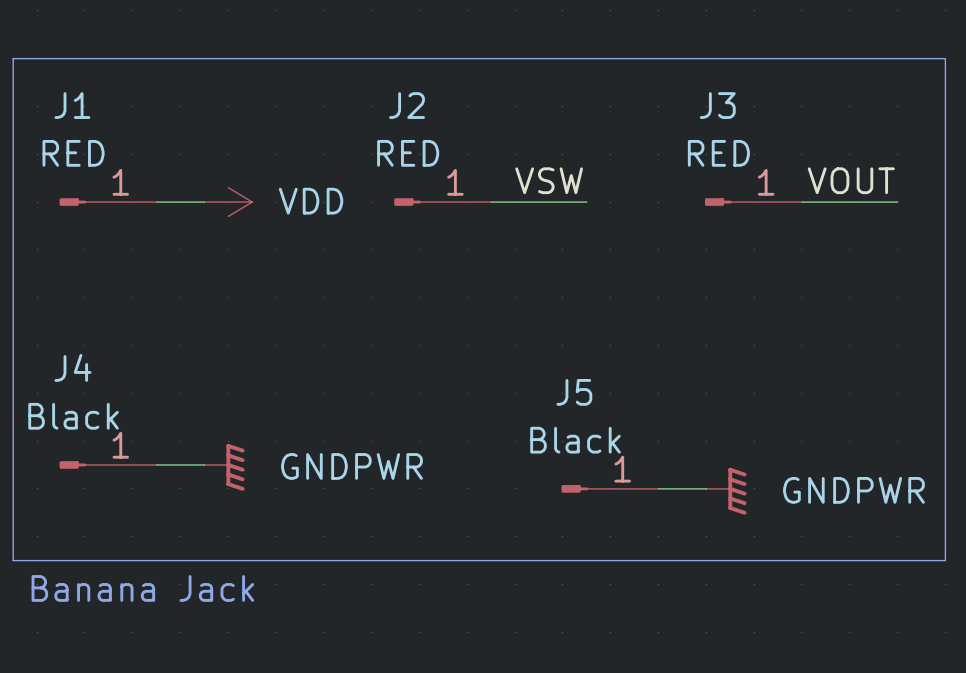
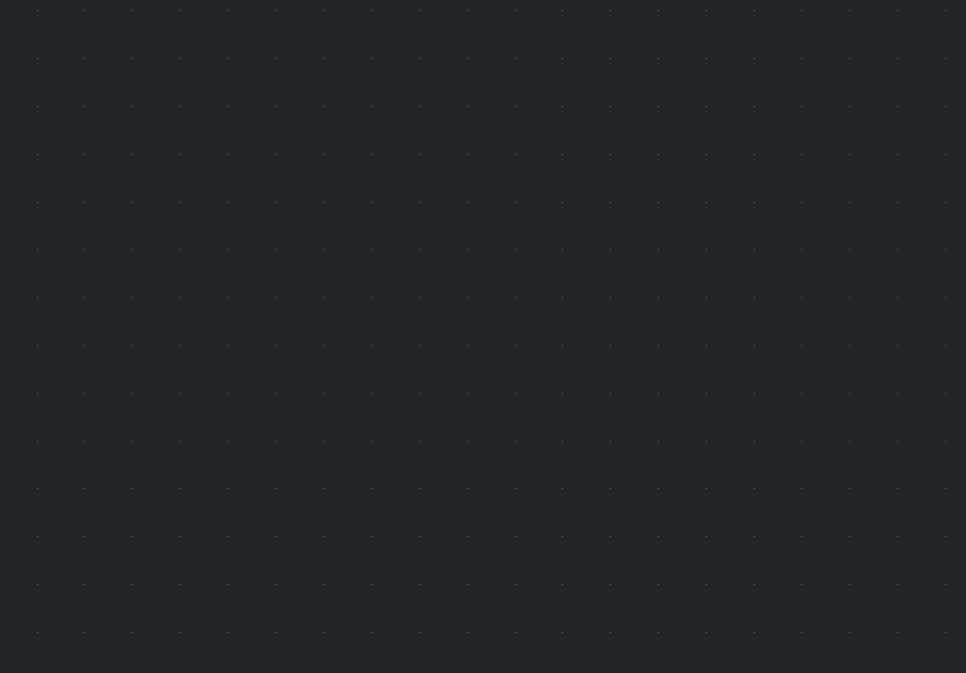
line: (13, 58) (945, 58) (945, 560) (13, 560) (13, 58) -> none
label: VSW (549, 180) -> none
label: VOUT (851, 180) -> none
J1: RED (108, 202) -> none
wire: (156, 202) (204, 202) -> none
power symbol: VDD (228, 202) -> none
J2: RED (442, 202) -> none
wire: (491, 202) (586, 202) -> none
J3: RED (753, 202) -> none
wire: (801, 202) (897, 202) -> none
J4: Black (108, 464) -> none
wire: (156, 464) (204, 464) -> none
power symbol: GNDPWR (224, 467) -> none
J5: Black (610, 488) -> none
wire: (658, 488) (706, 488) -> none
power symbol: GNDPWR (726, 491) -> none
text: Banana Jack (142, 588) -> none

